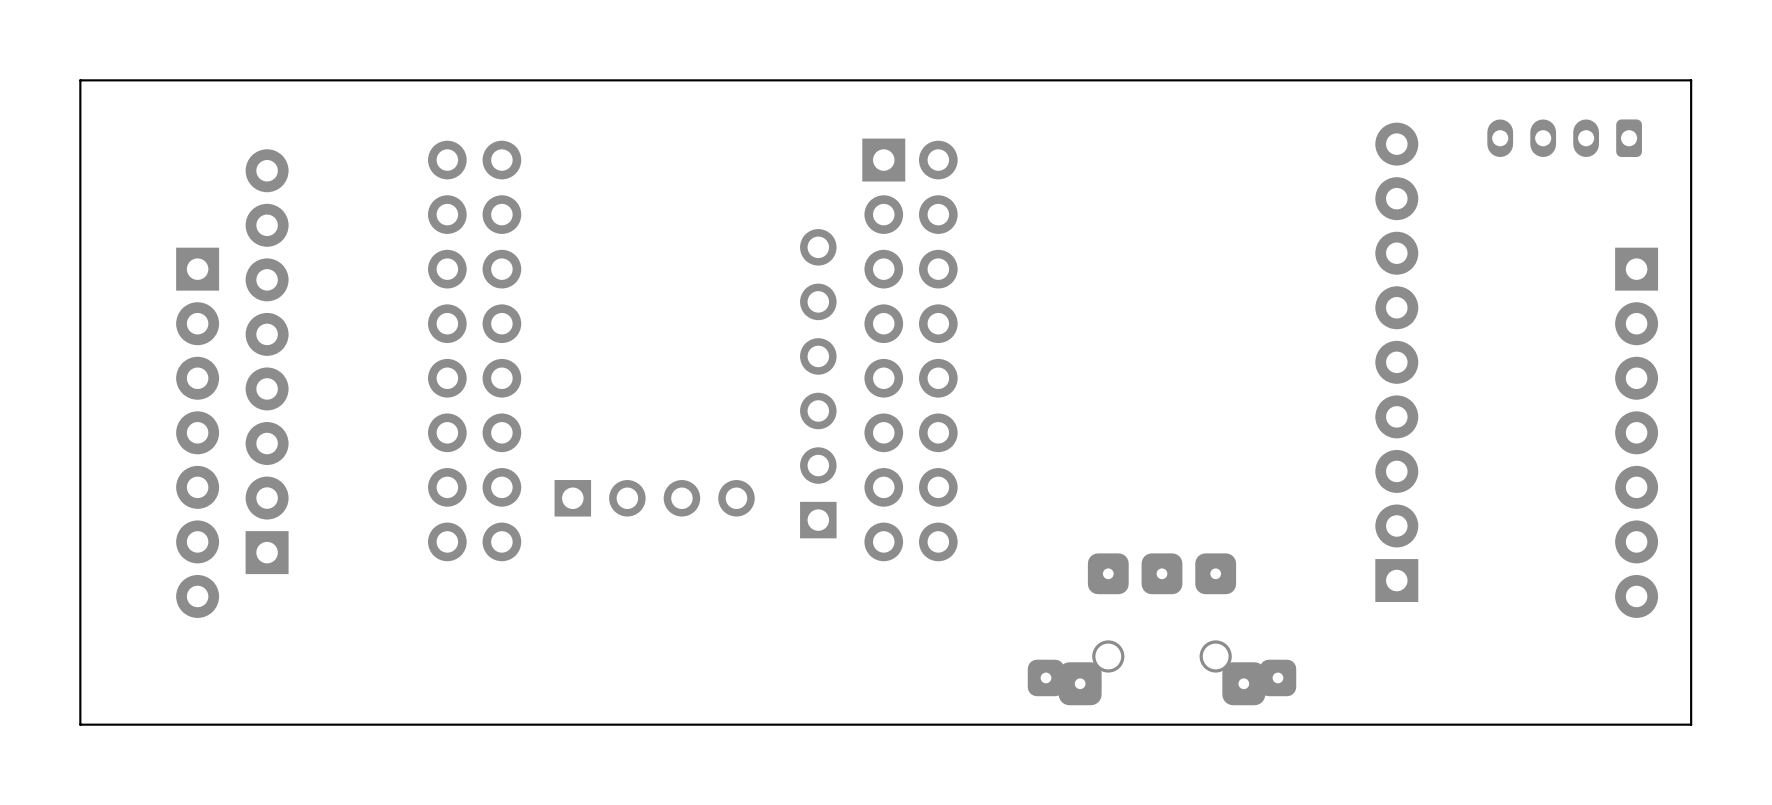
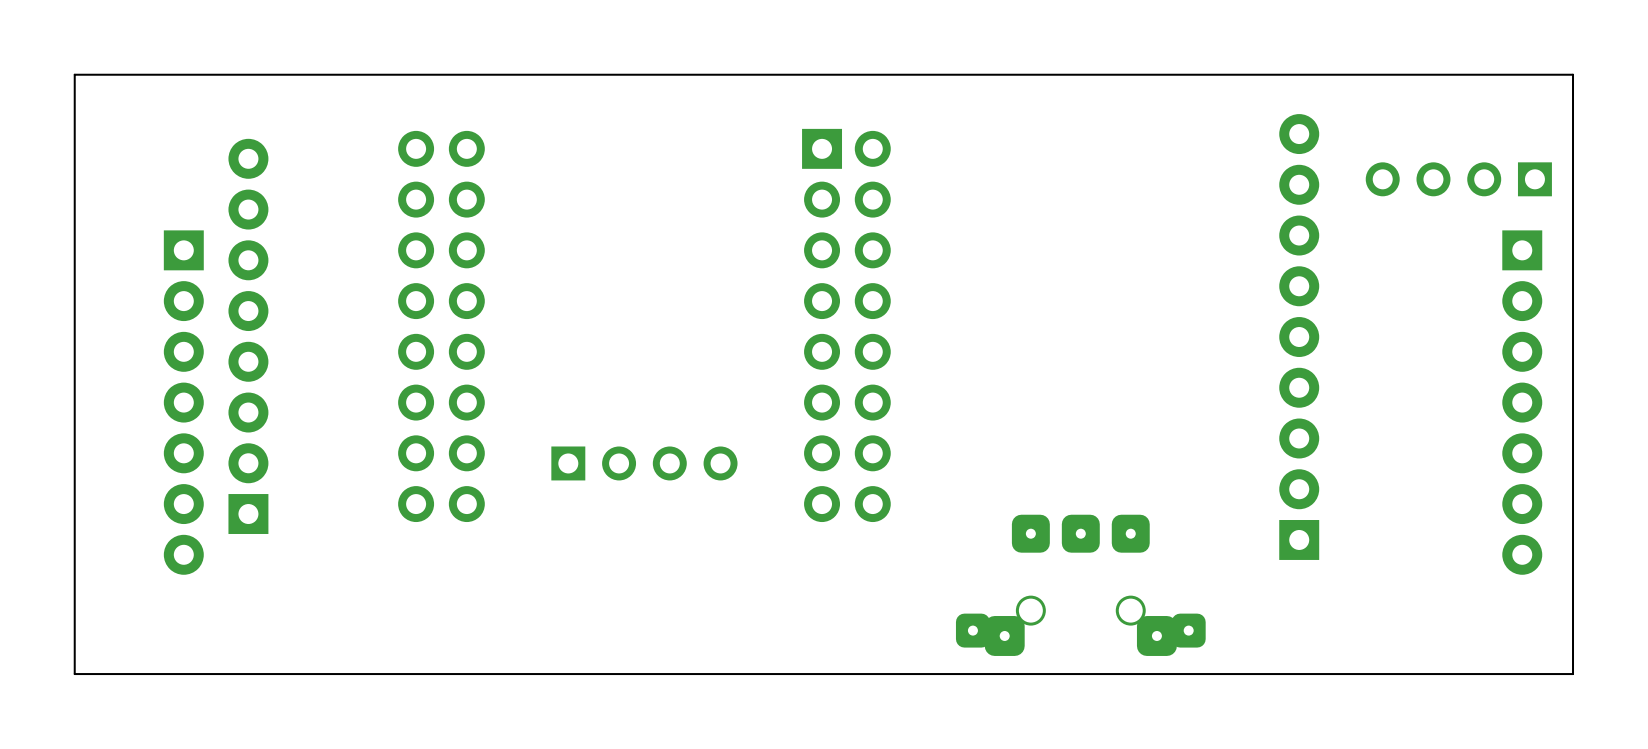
part: (1564, 138) -> none
part: none -> (1458, 179)
part: (818, 383) -> none
part position: (654, 498) -> (644, 463)

